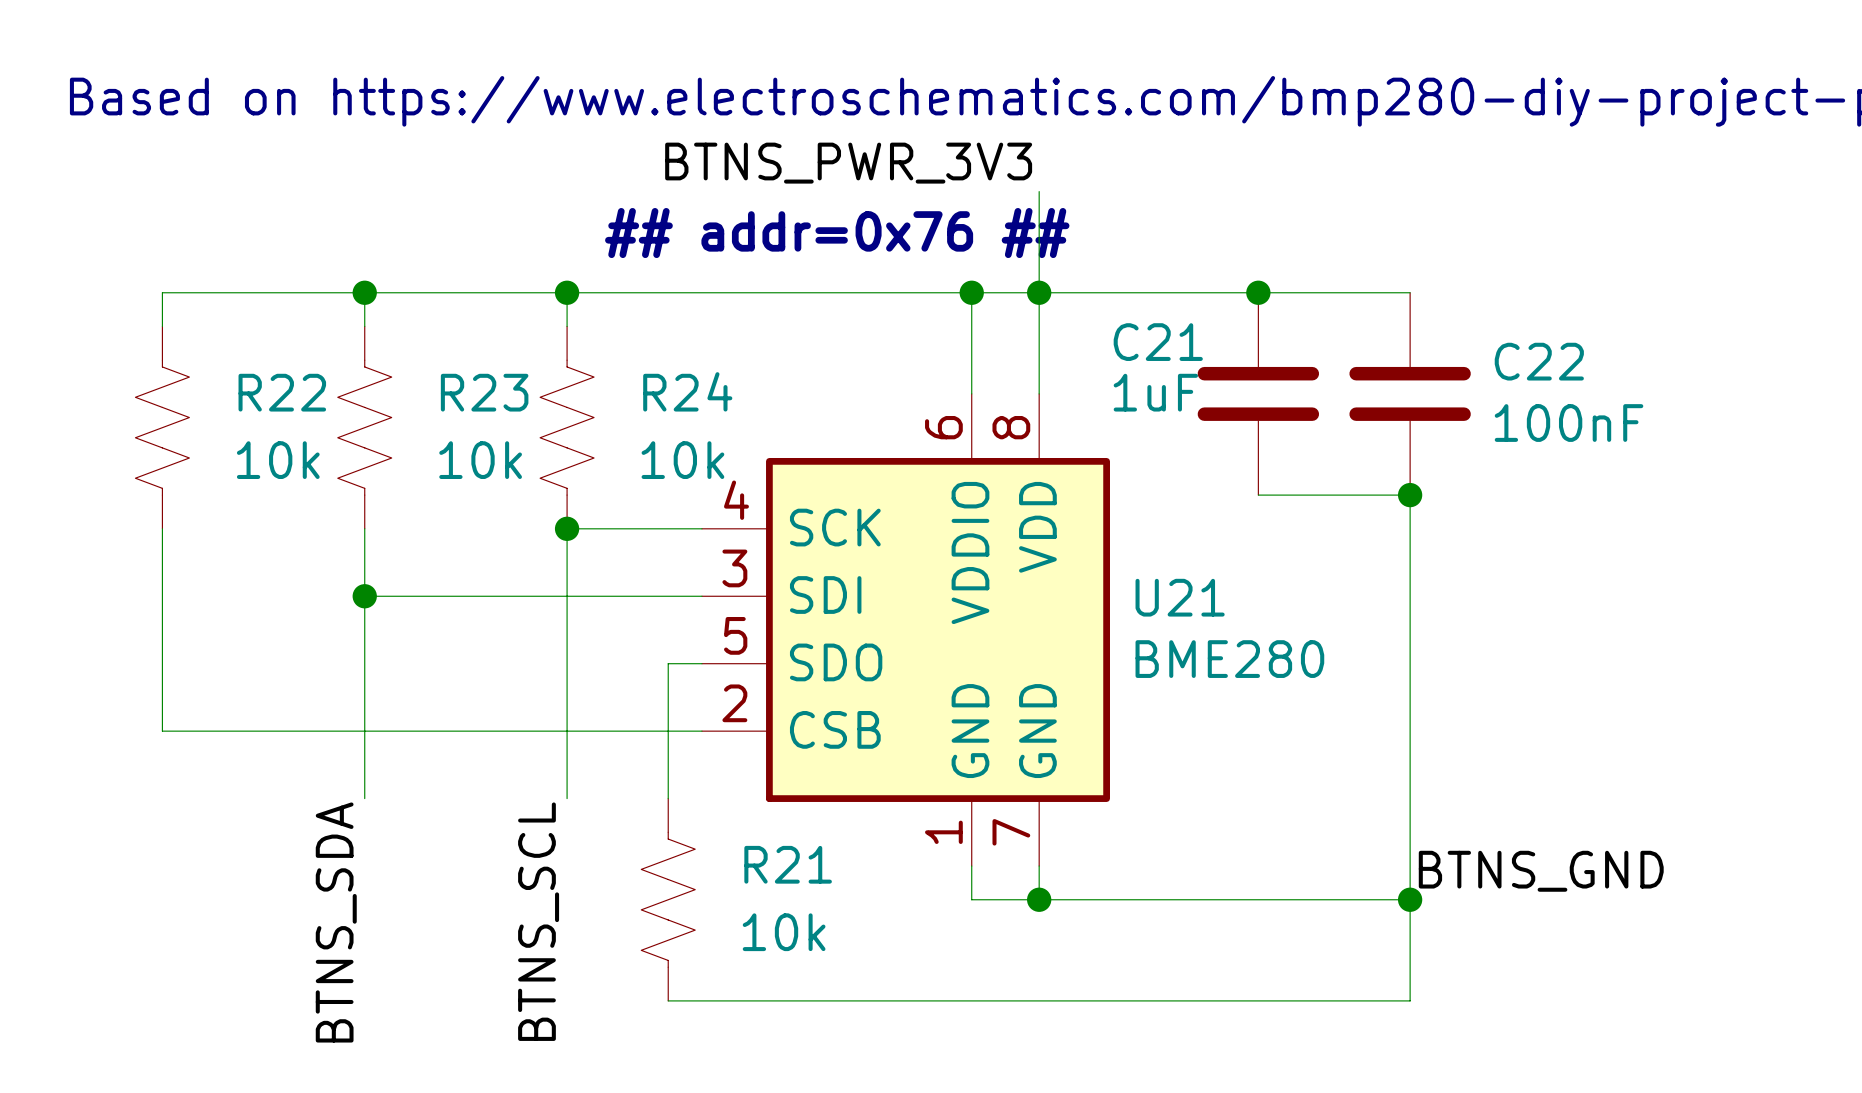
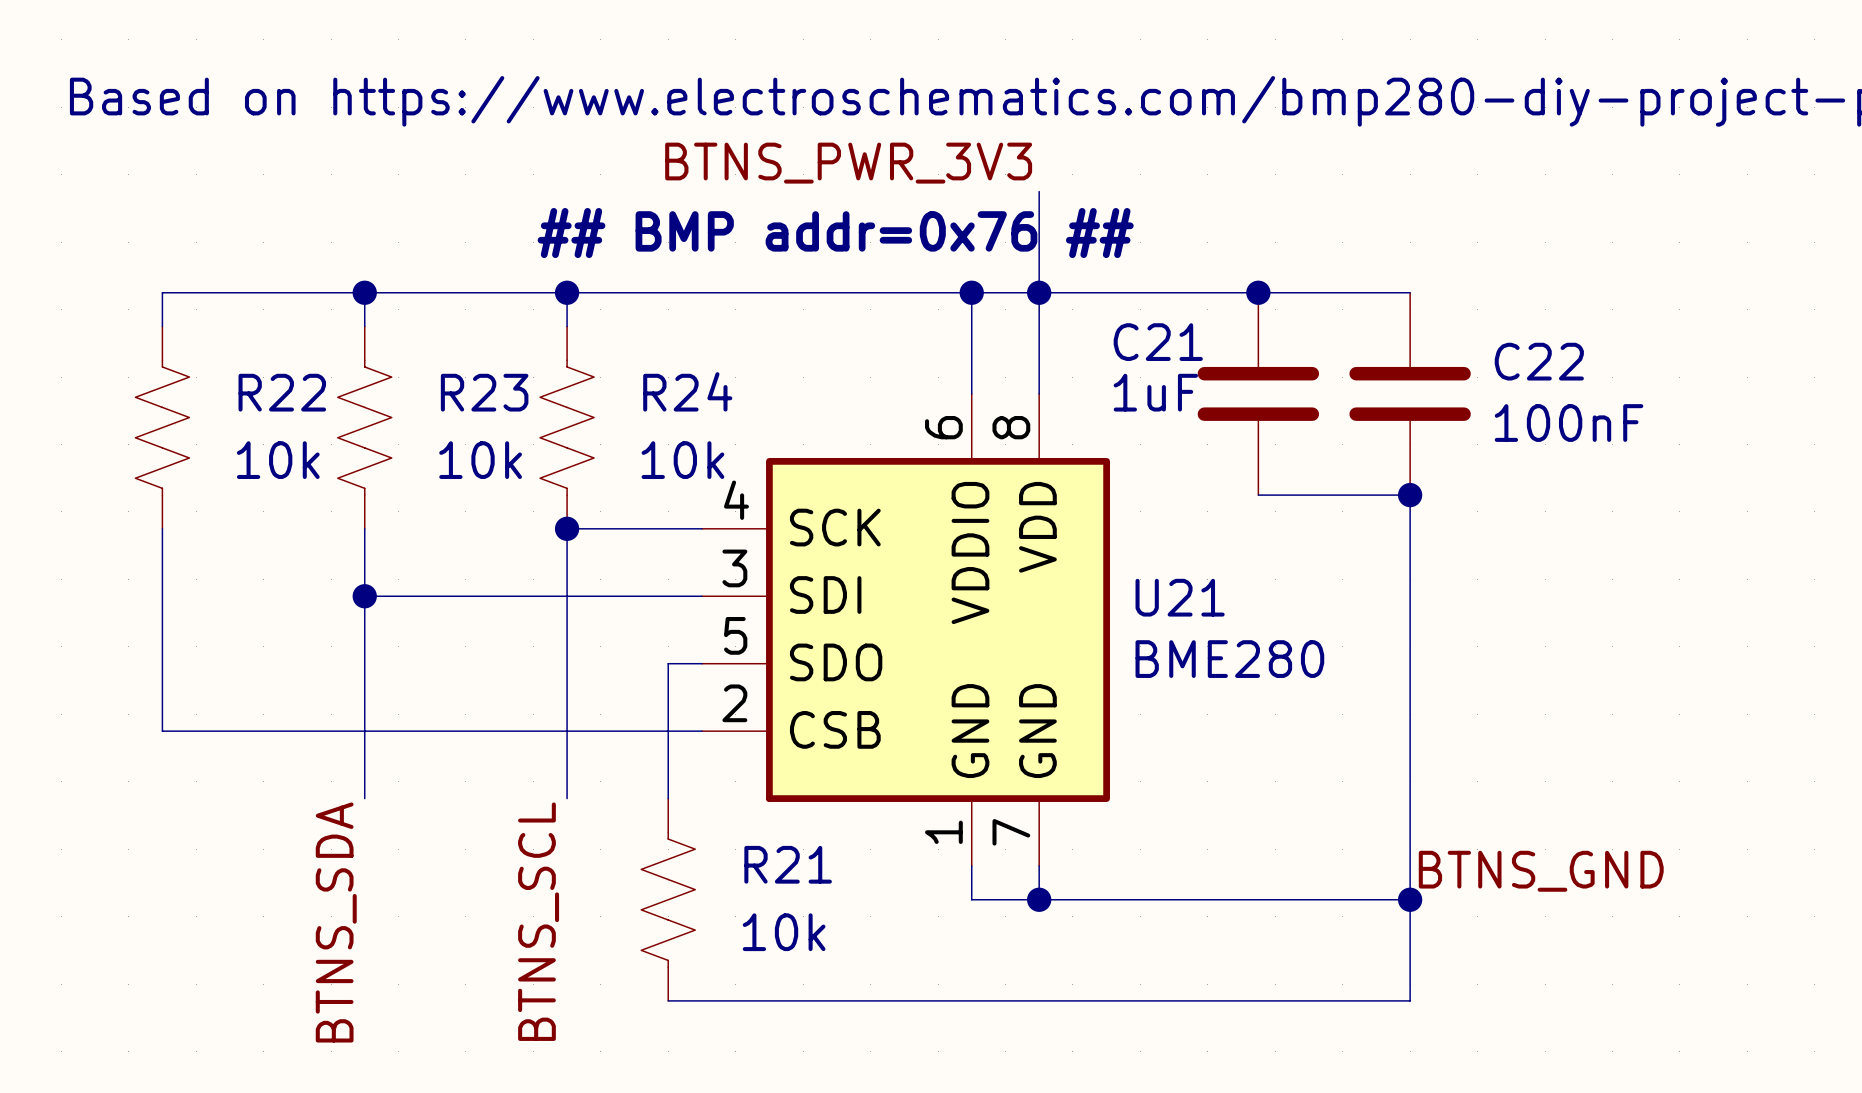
text: ## addr=0x76 ## (837, 233) -> ## BMP addr=0x76 ## (835, 233)

